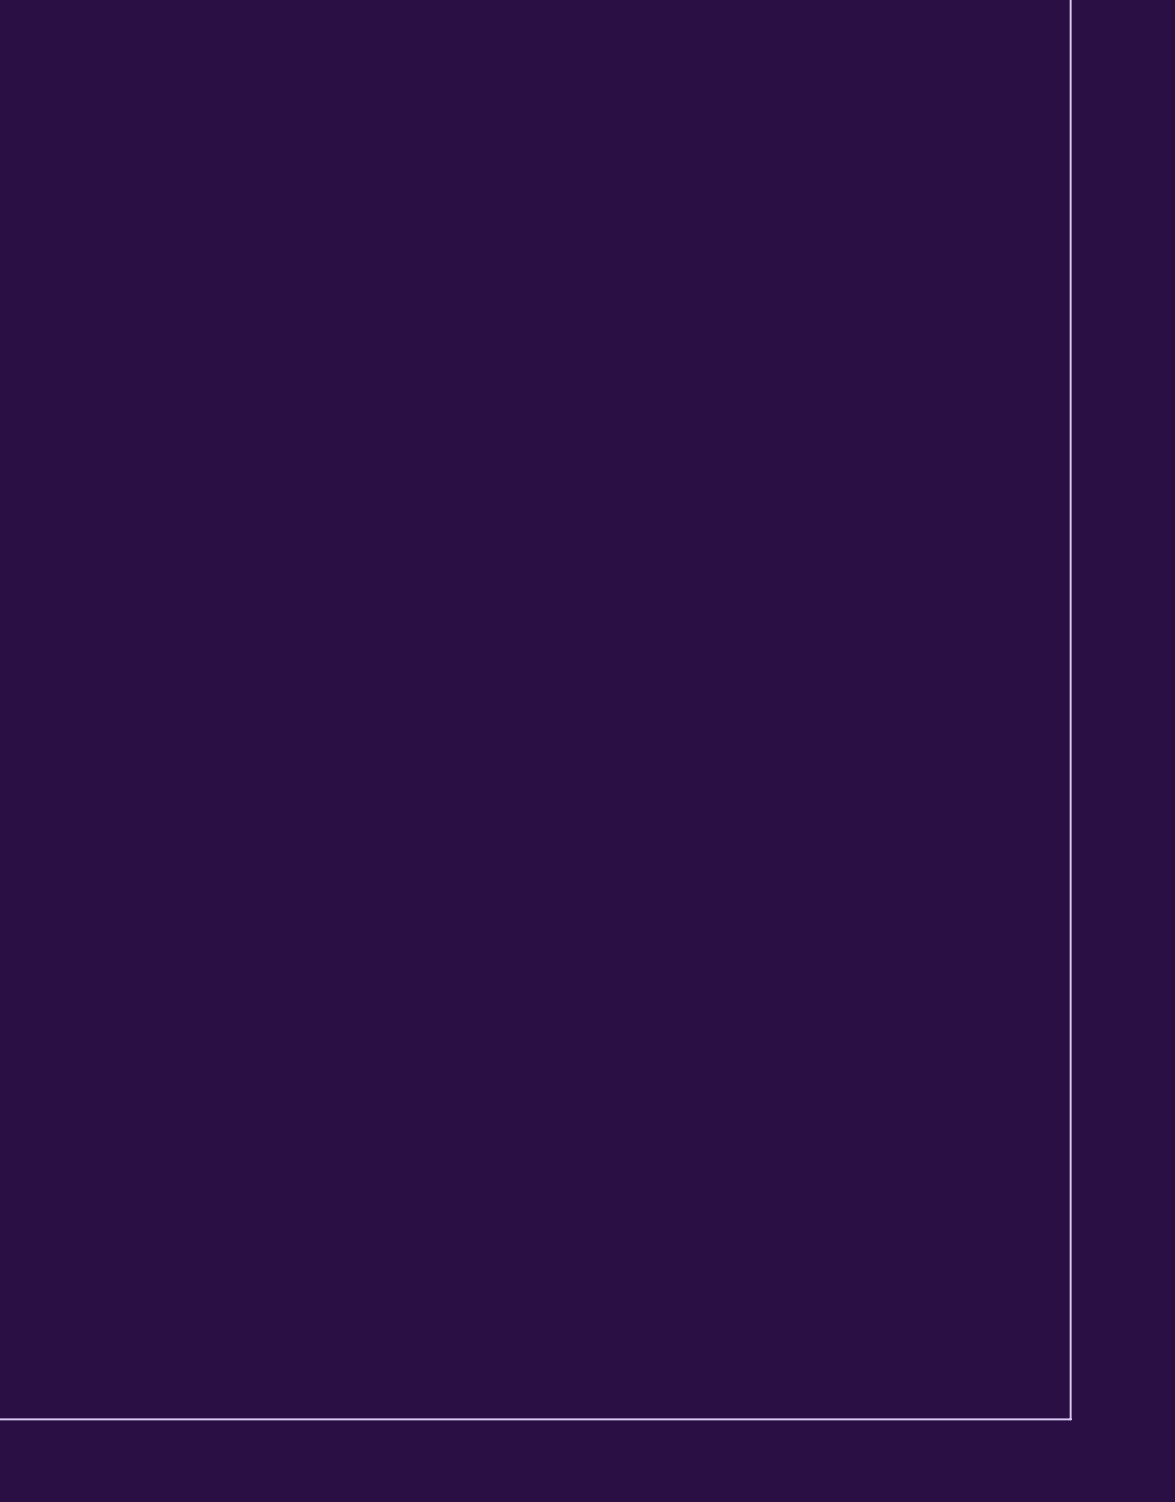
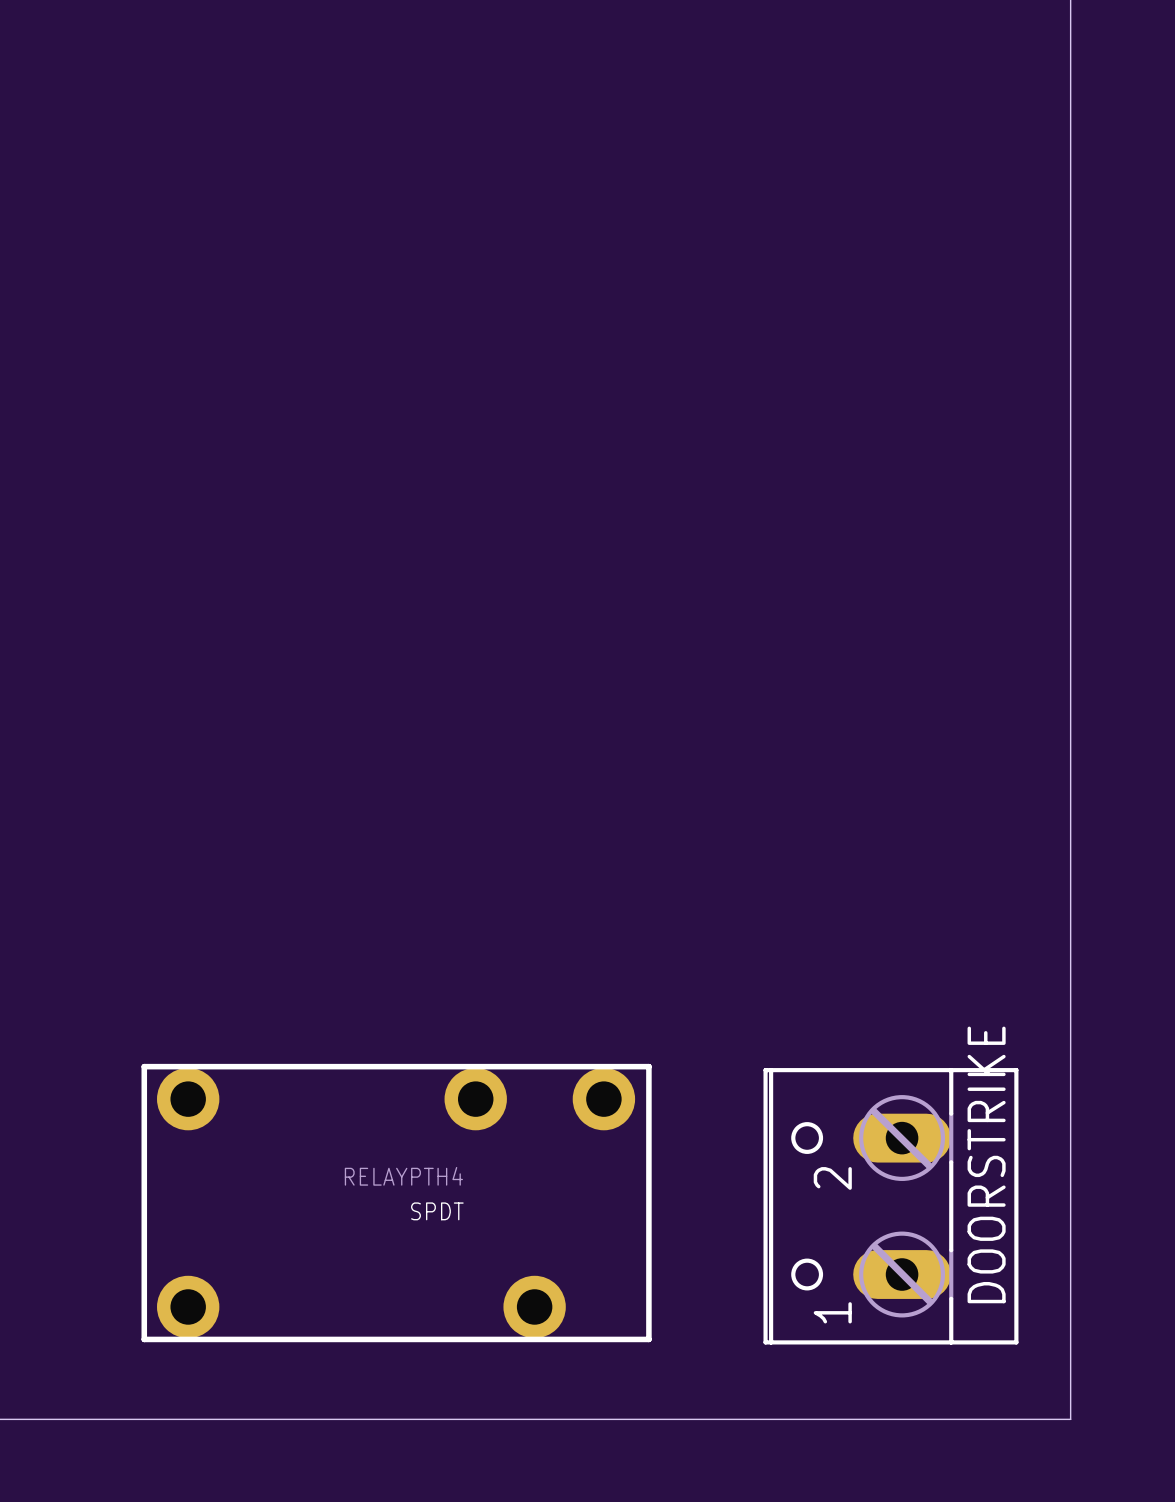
SPDT: none -> RELAYPTH4 (396, 1203)
DOORSTRIKE: none -> (890, 1206)

